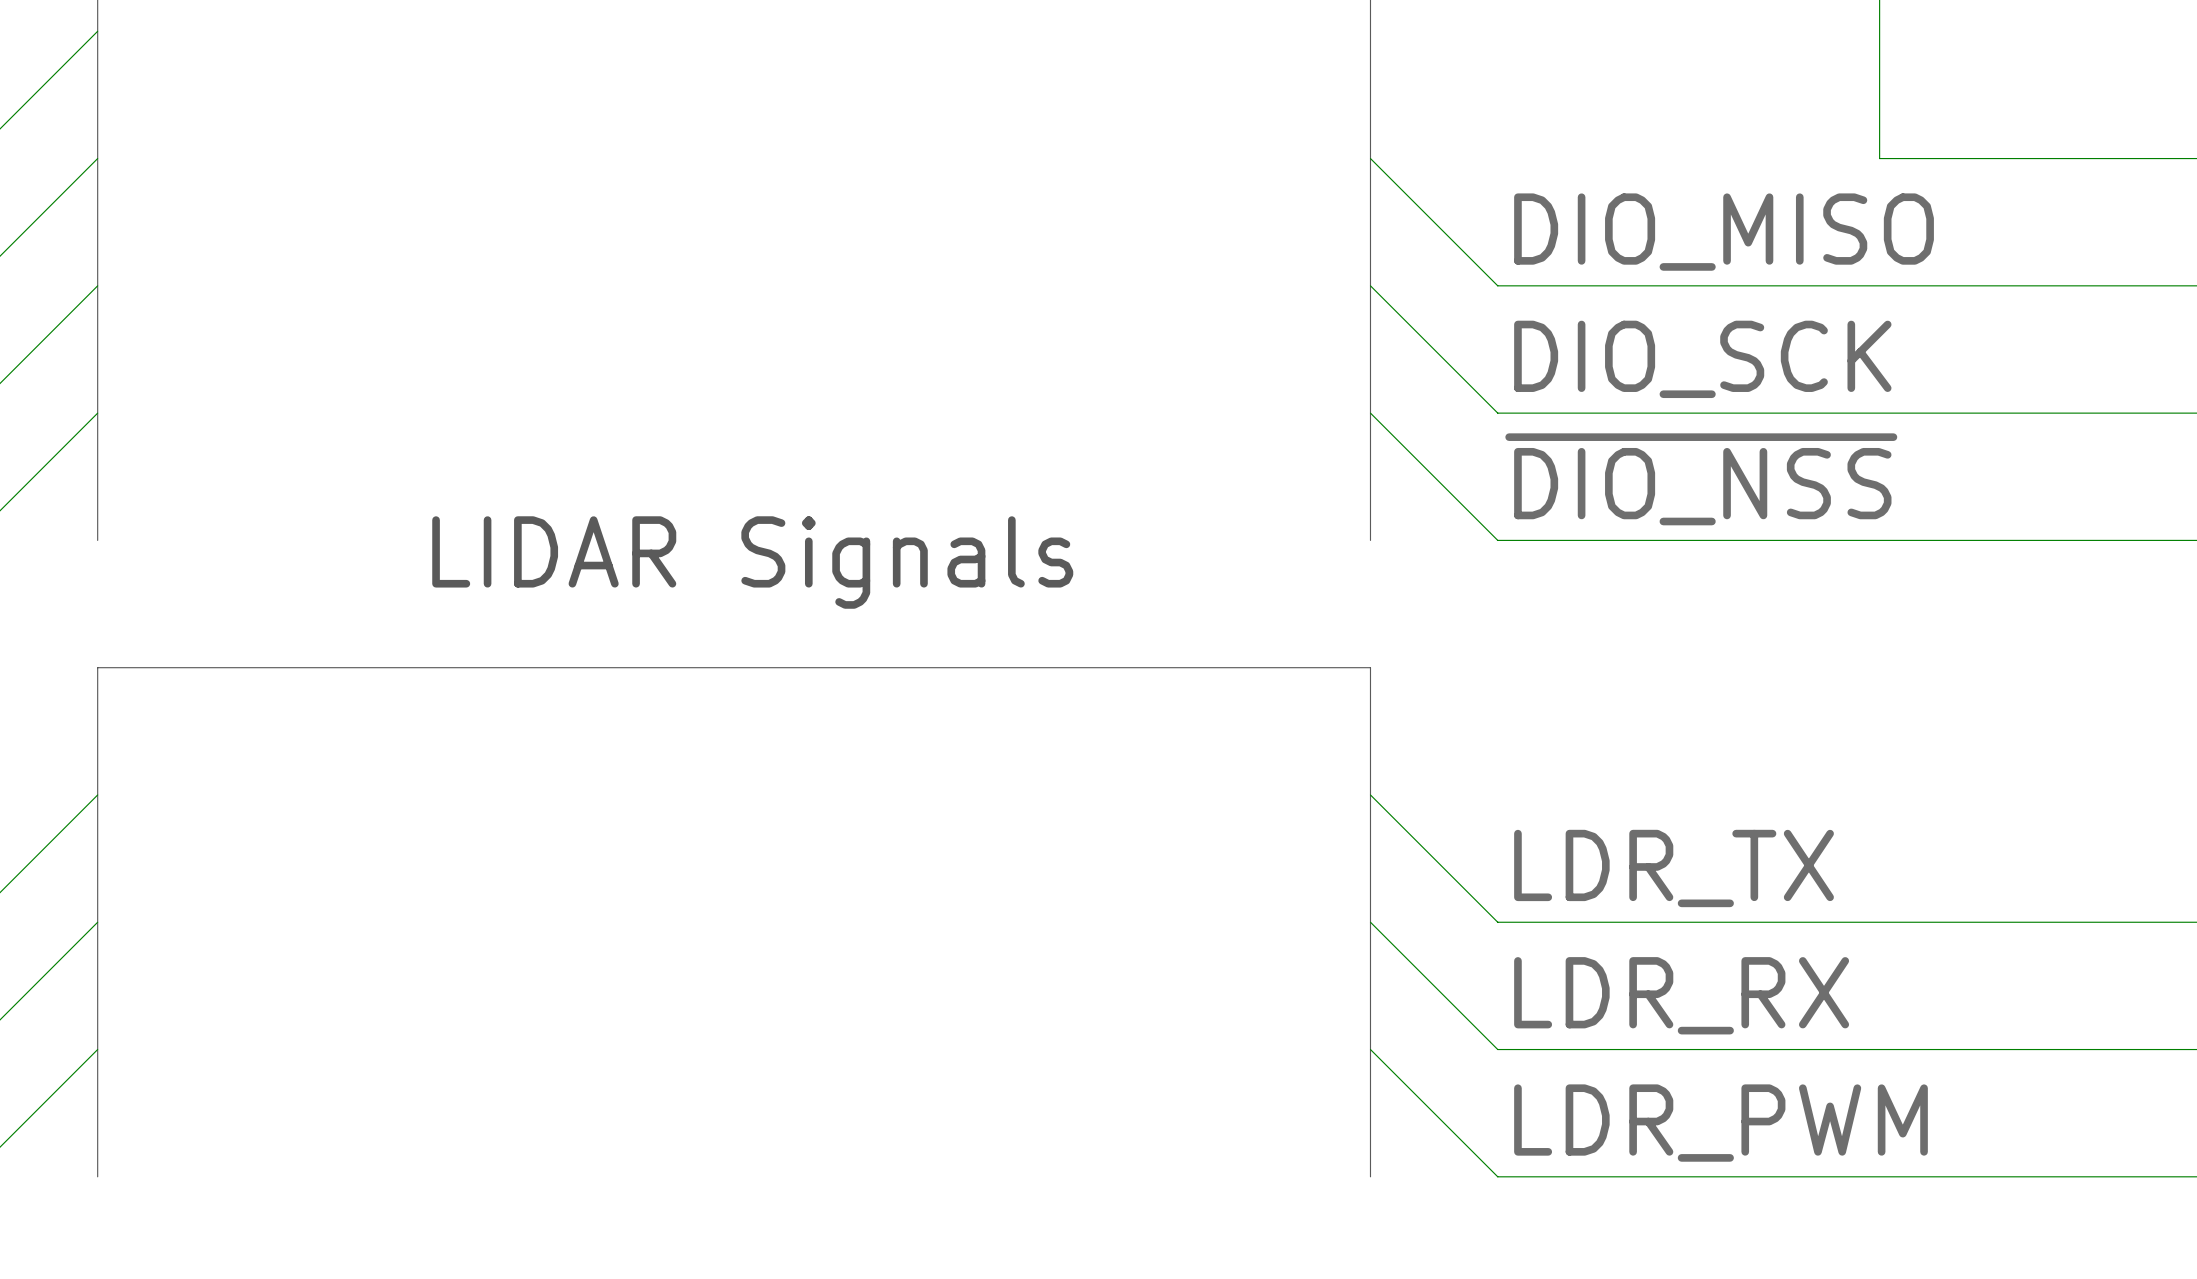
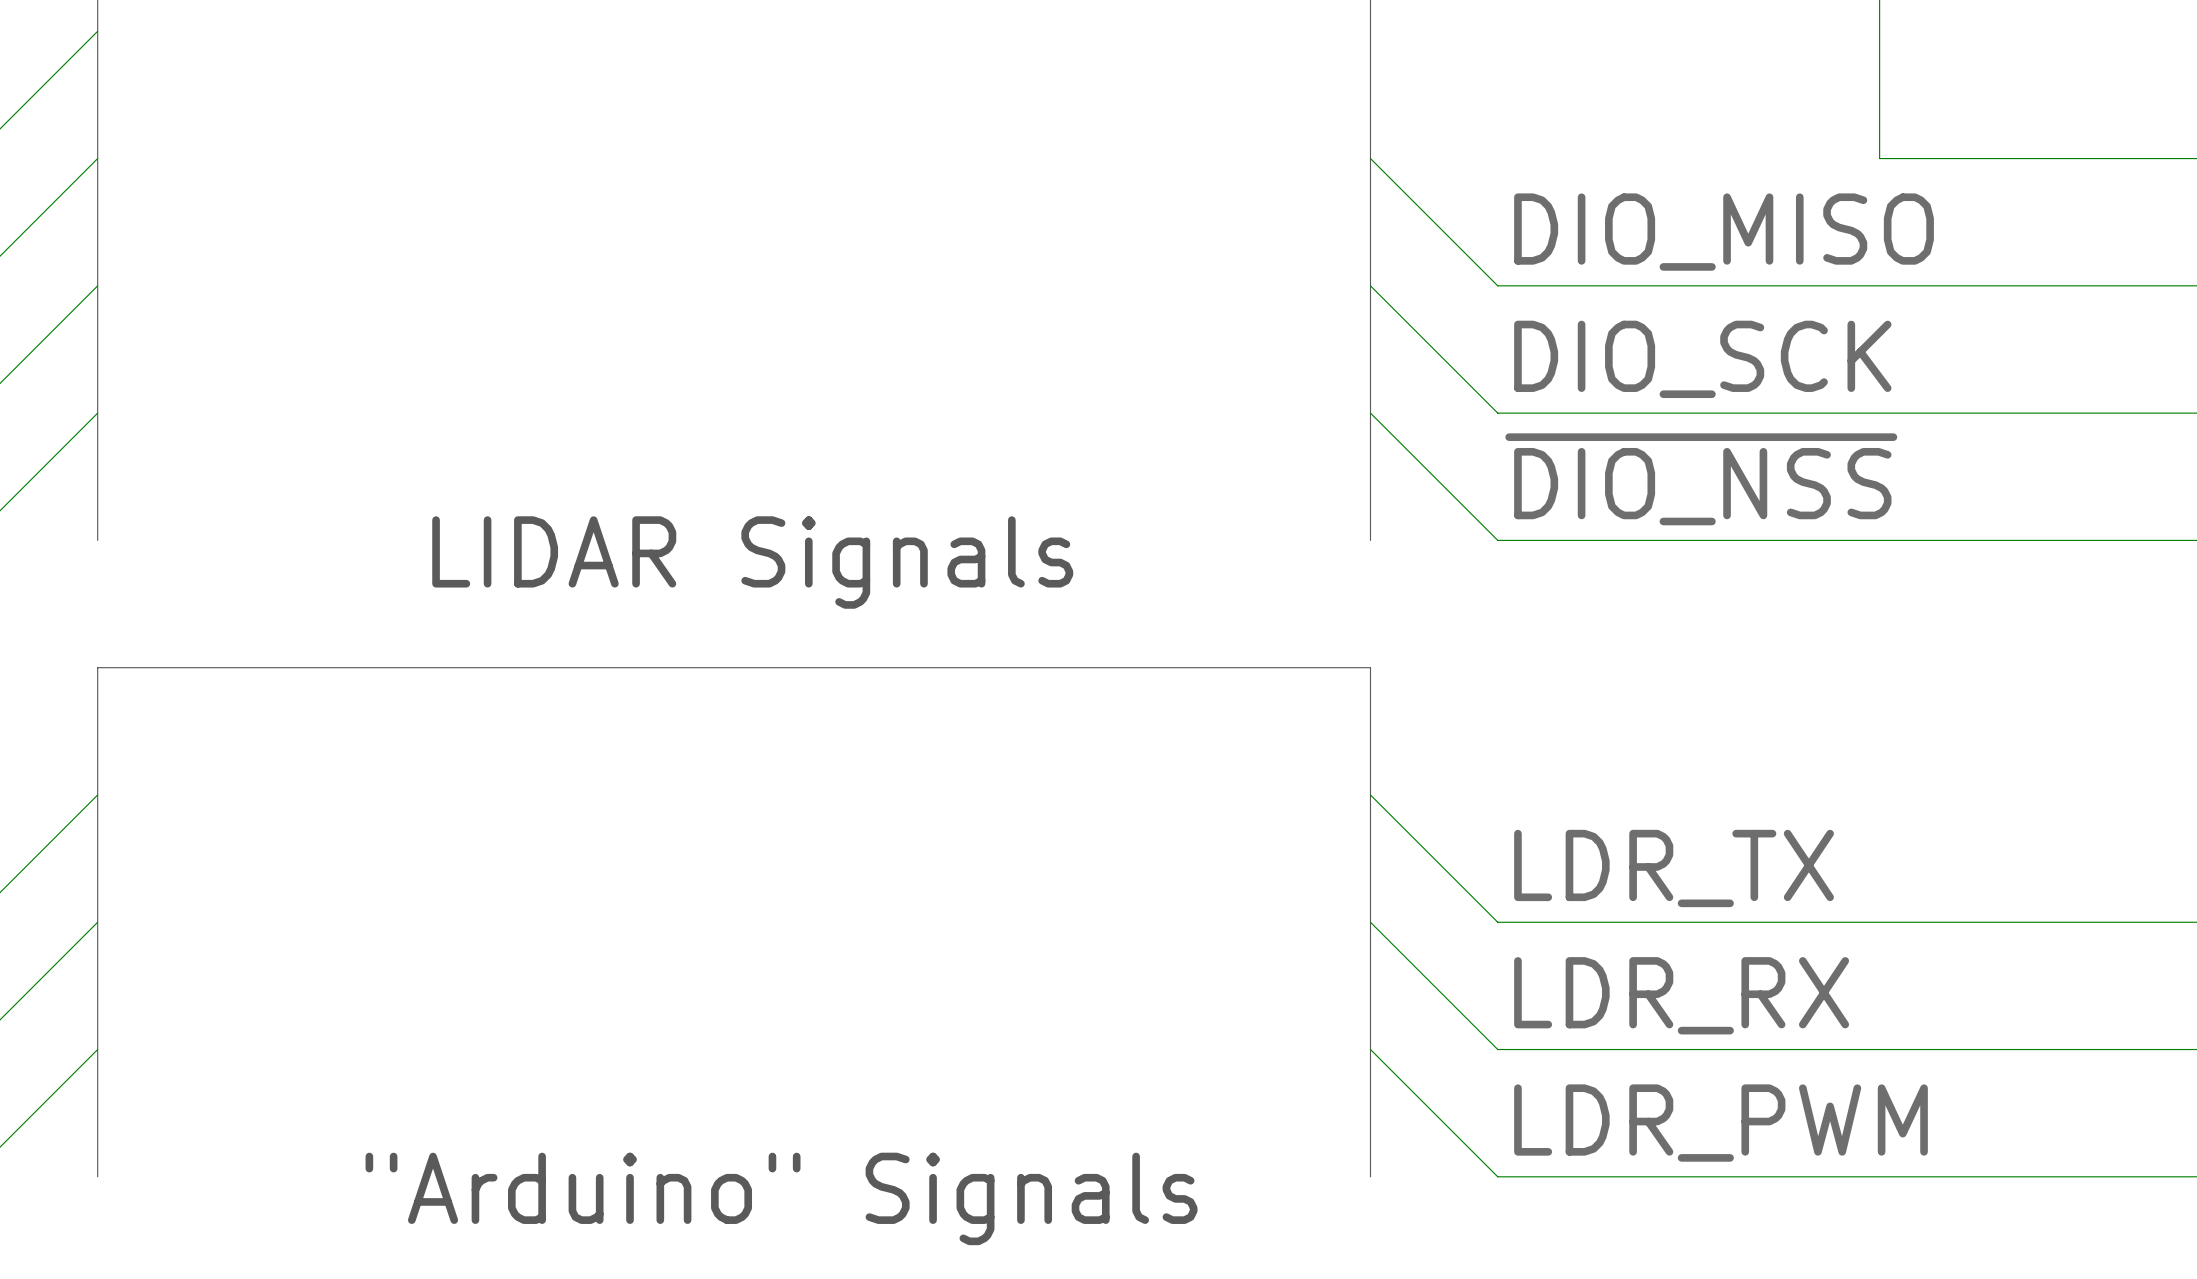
text: none -> "Arduino" Signals (781, 1198)

